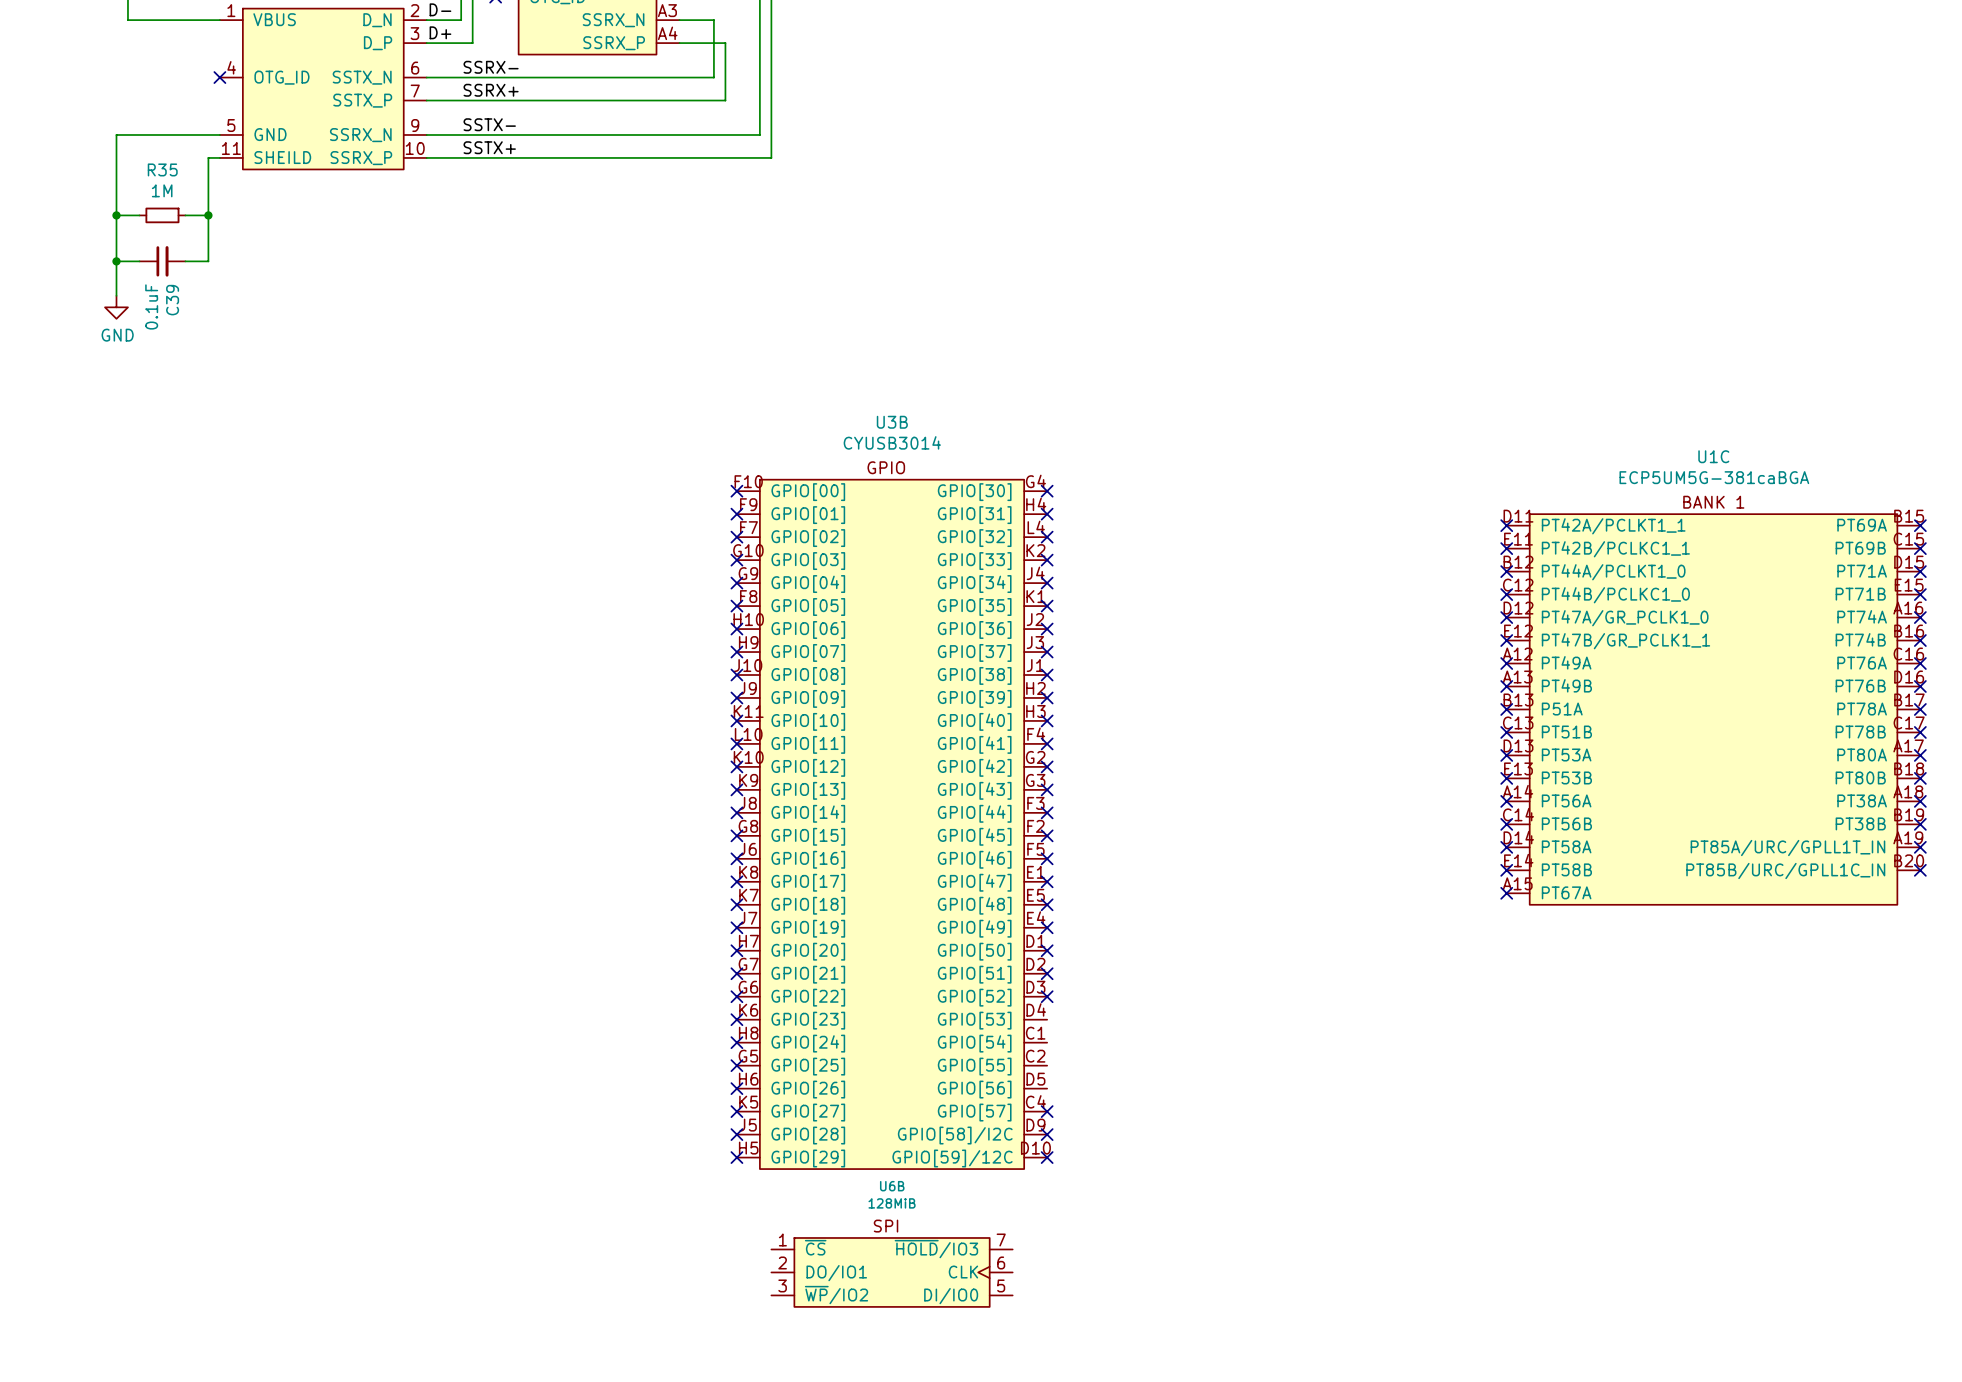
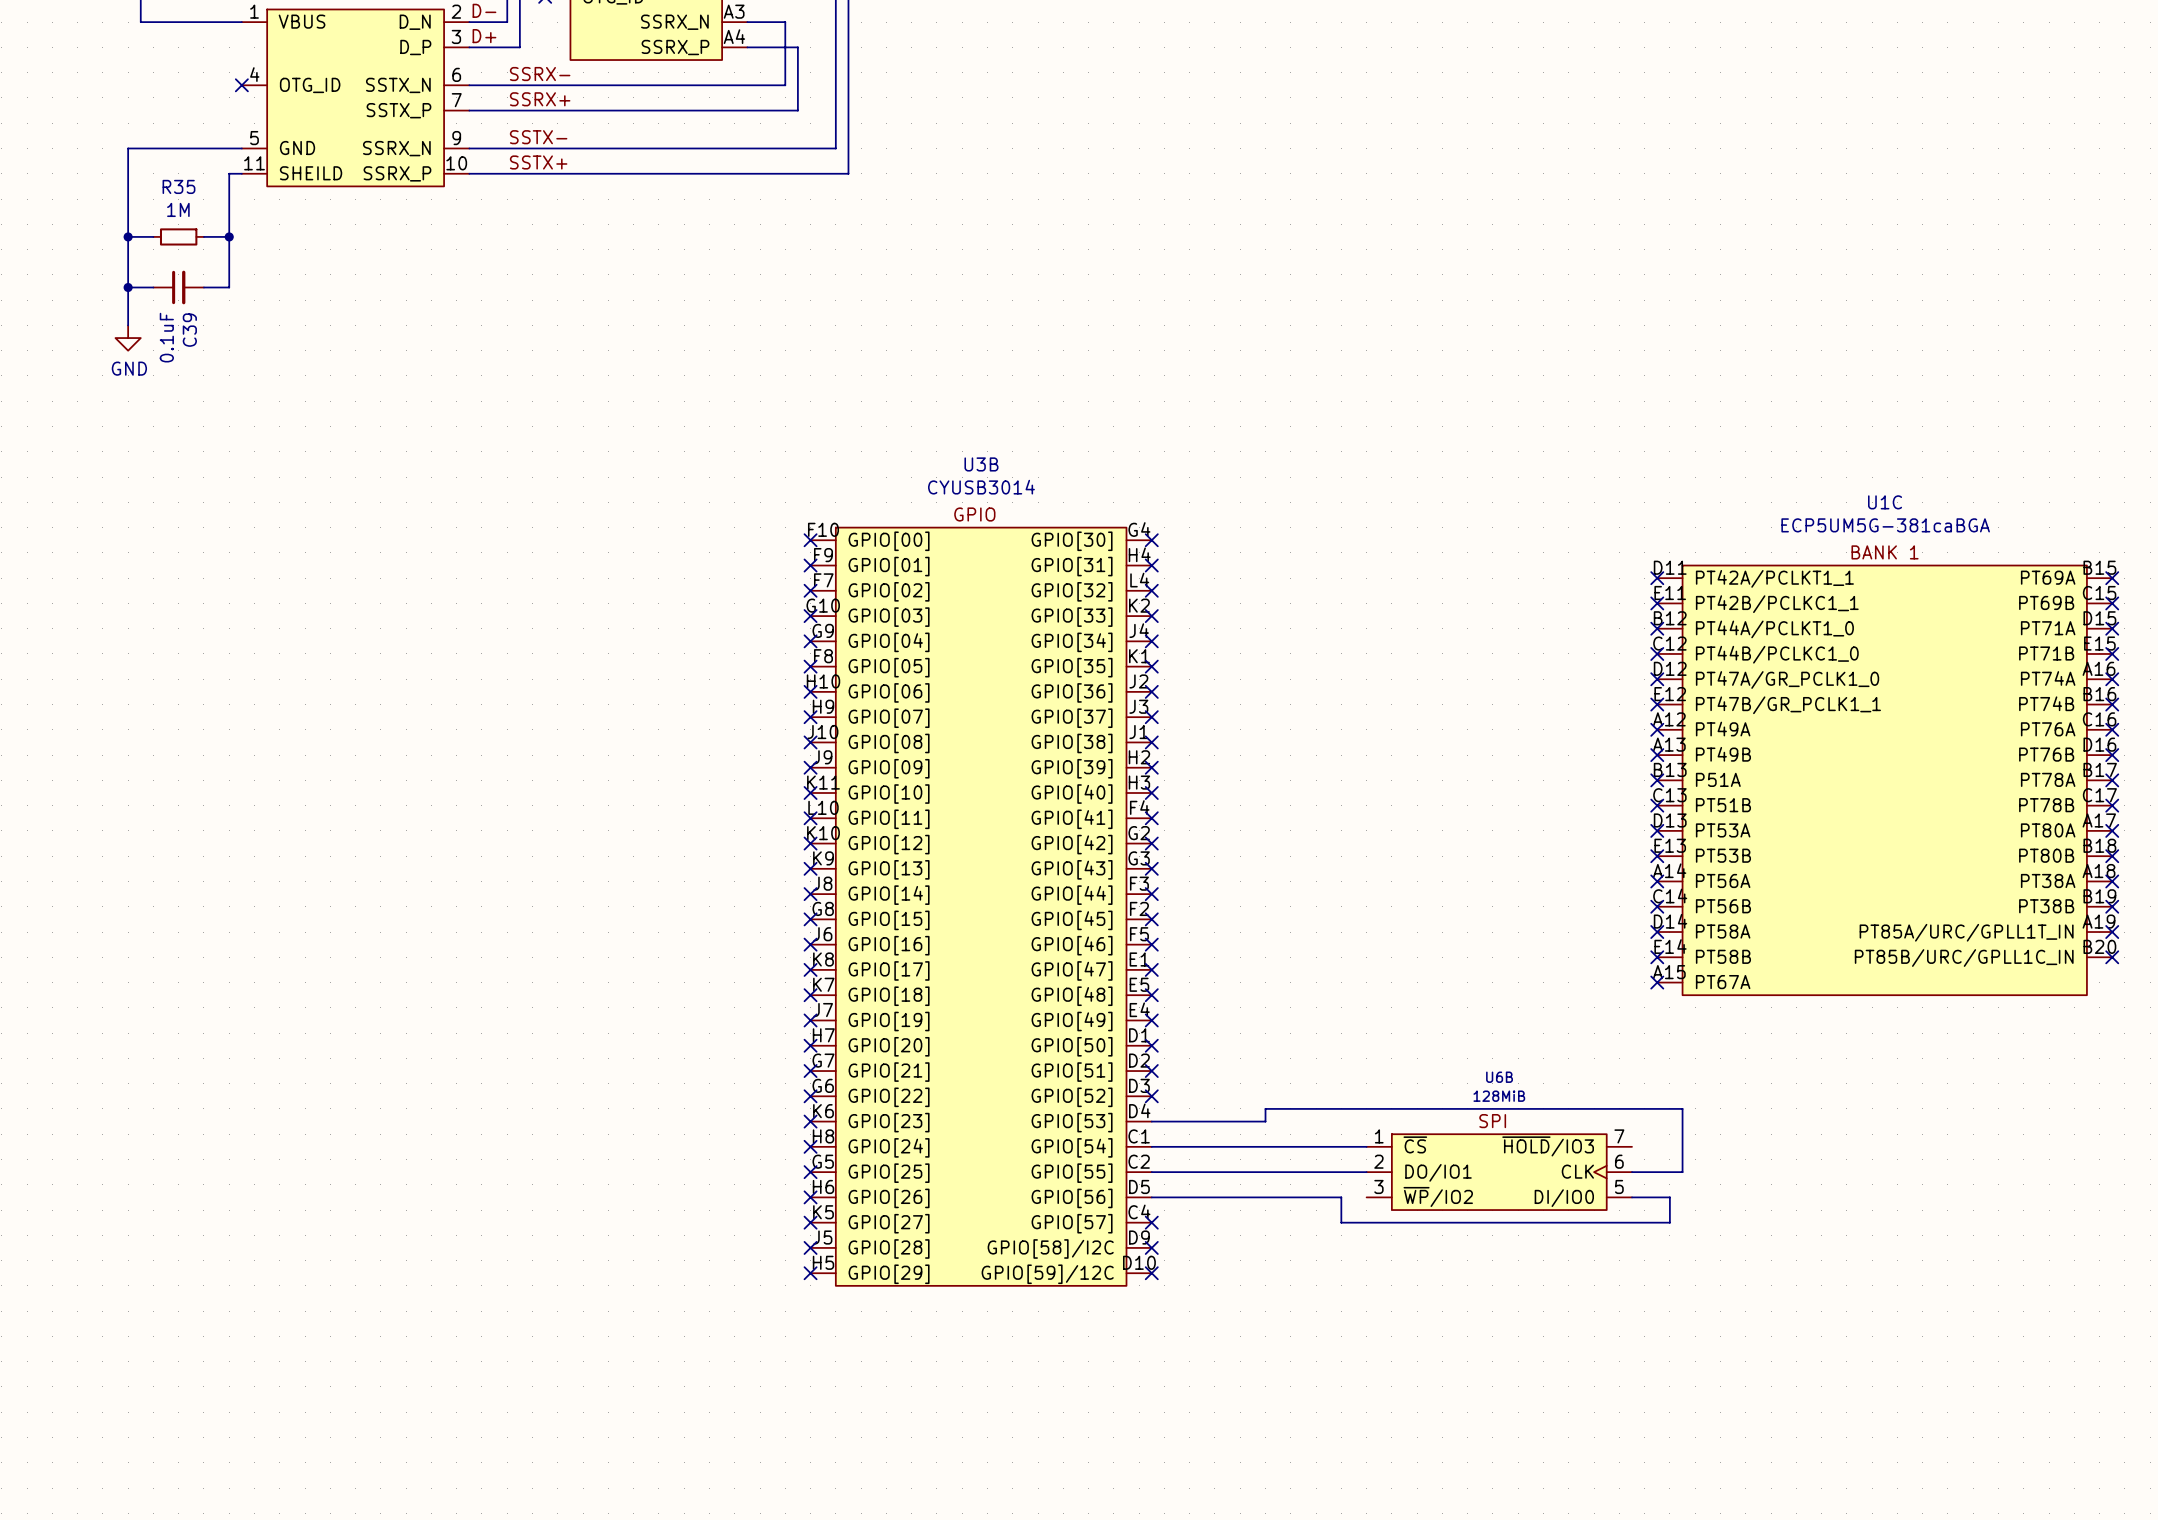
wire: none -> (1151, 1121) (1265, 1121) (1265, 1108) (1682, 1108) (1682, 1172) (1632, 1172)
wire: none -> (1151, 1146) (1366, 1146)
wire: none -> (1151, 1172) (1366, 1172)
wire: none -> (1151, 1197) (1341, 1197) (1341, 1222) (1669, 1222) (1669, 1197) (1632, 1197)
U6B position: (892, 1272) -> (1499, 1172)

